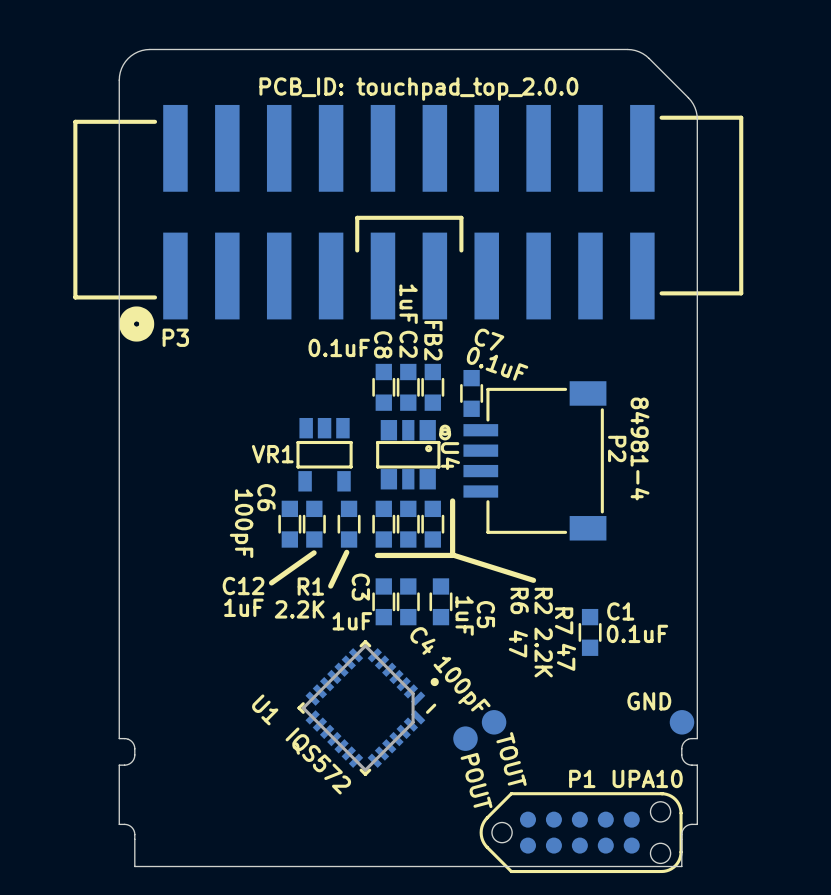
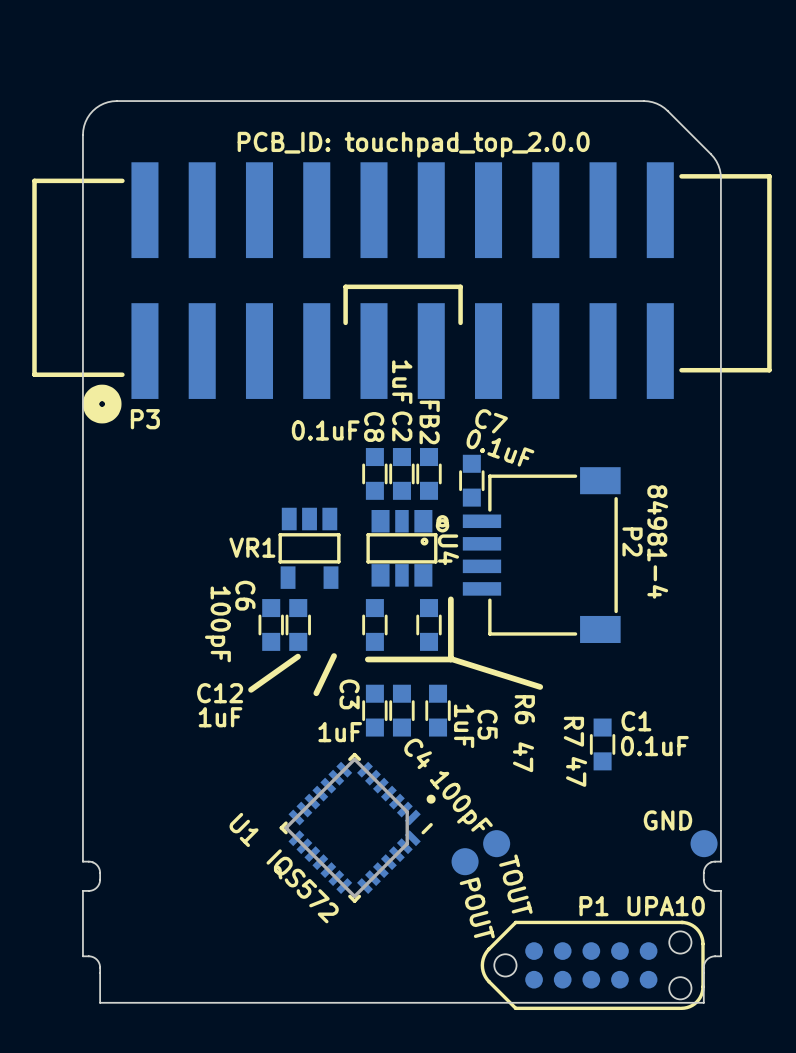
R1: 2.2K (349, 524) -> none
R2: 2.2K (408, 524) -> none

